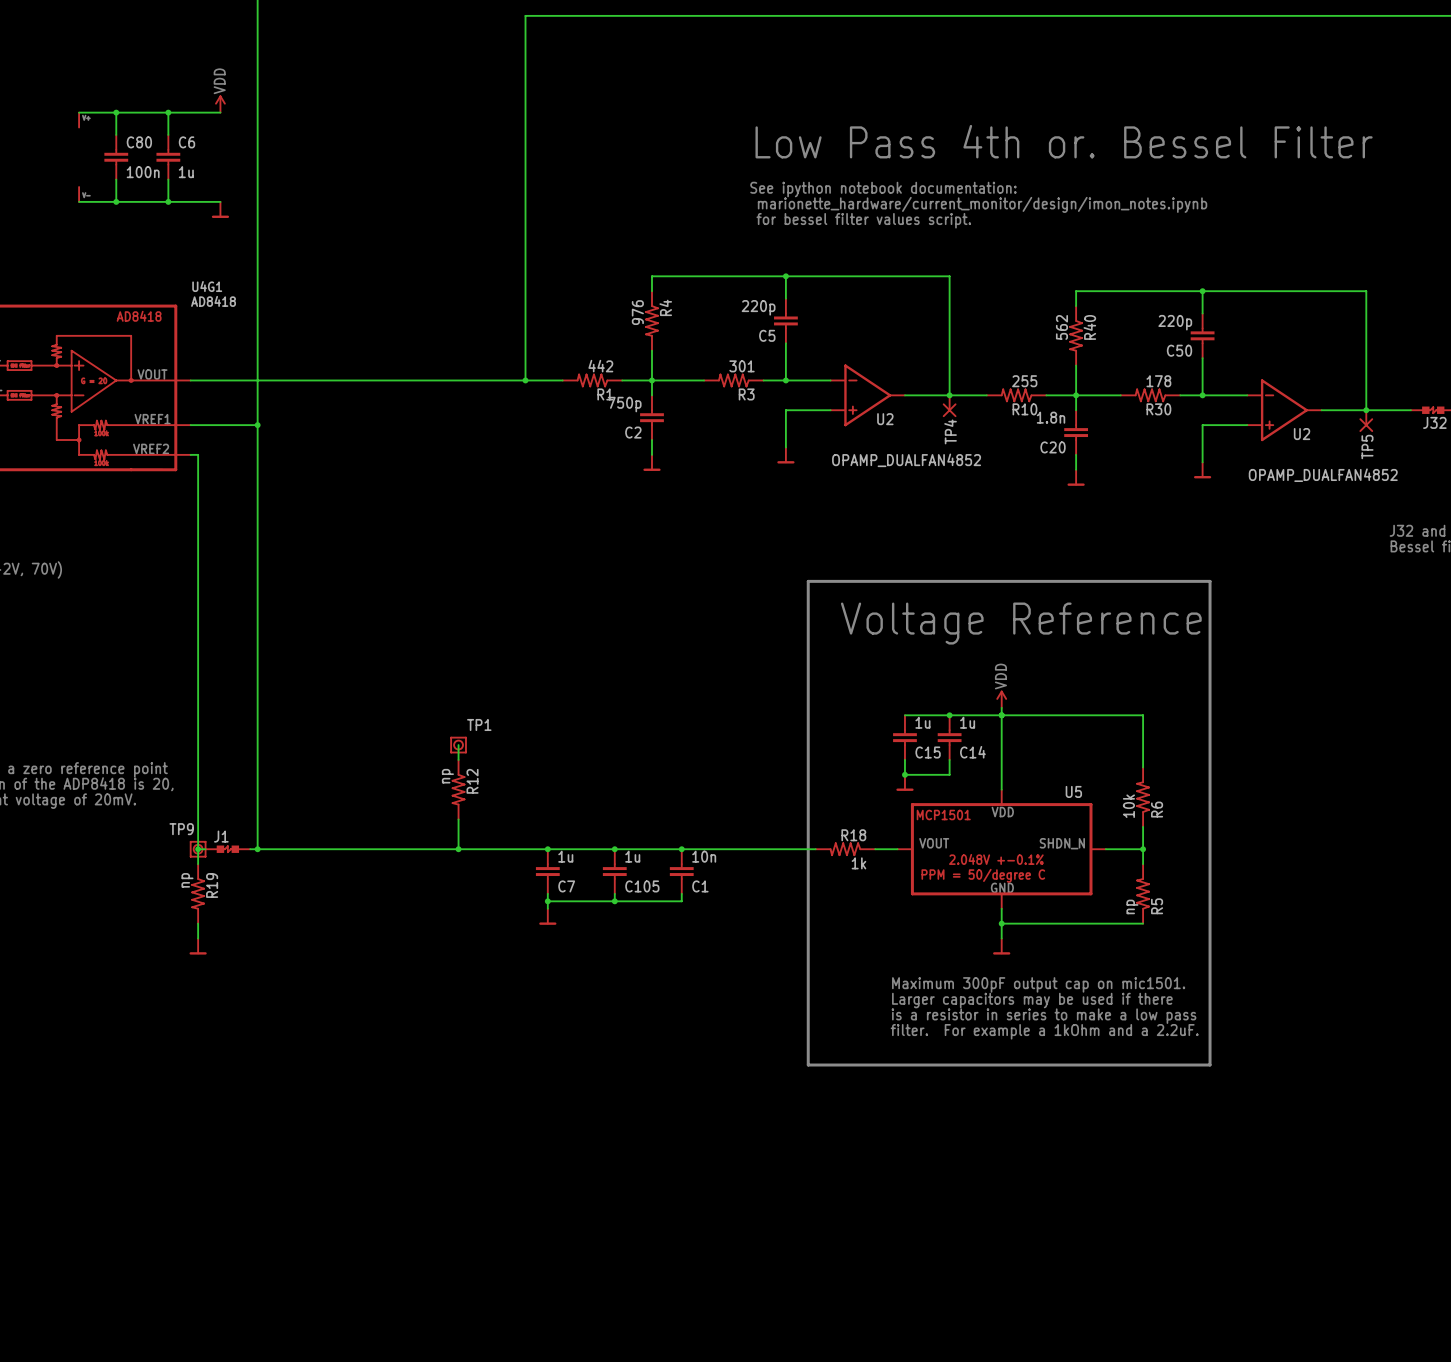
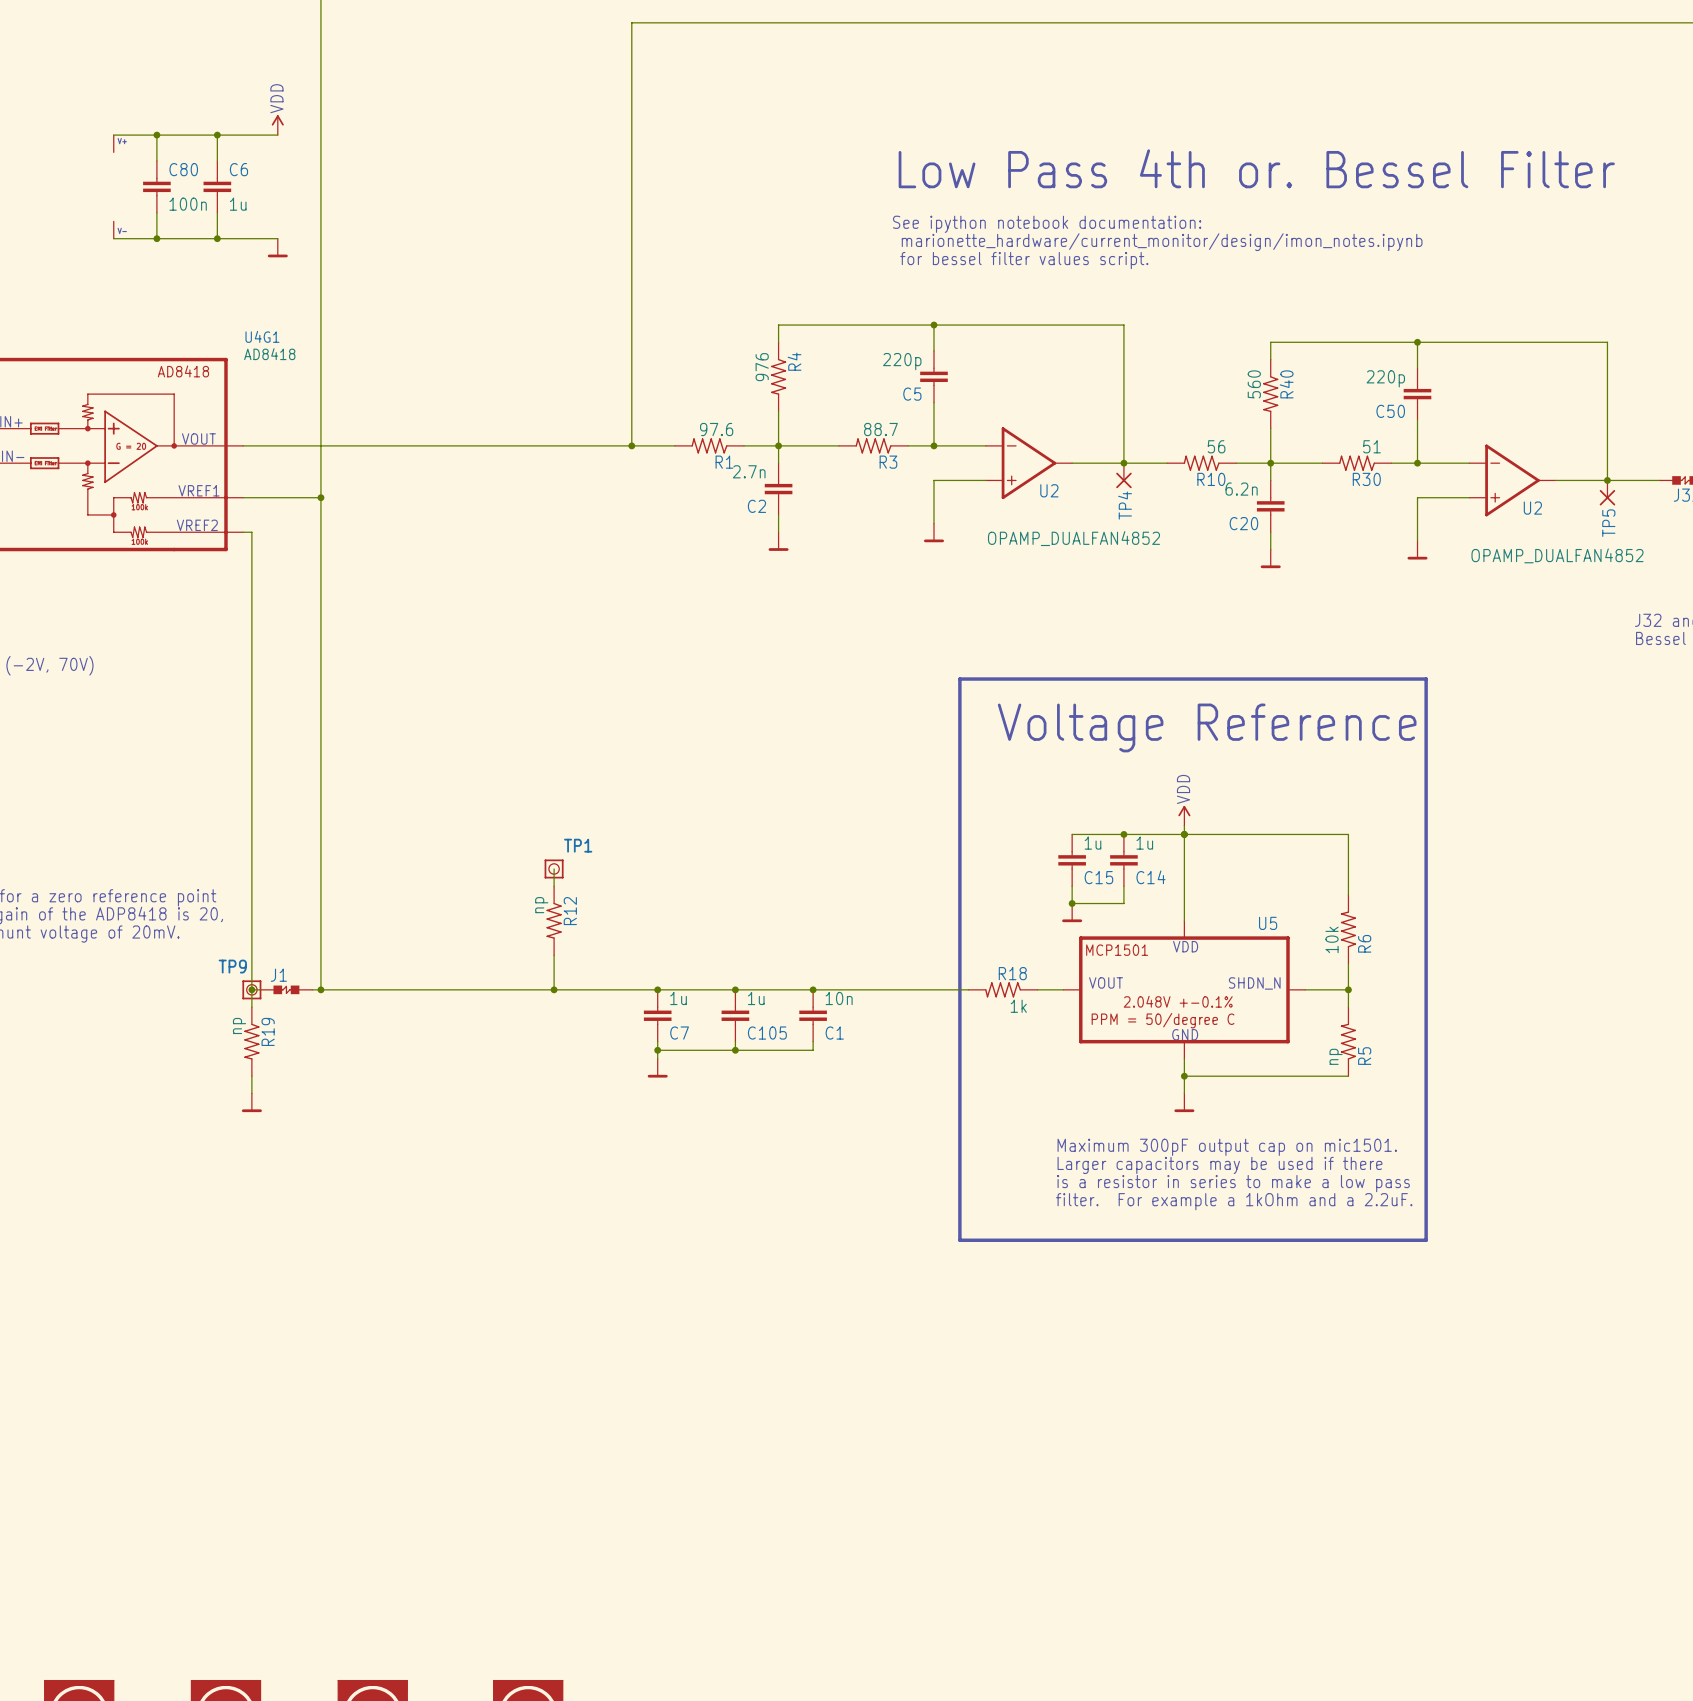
R40 value: 562 (1061, 327) -> 560 (1254, 384)
R1 value: 442 (600, 366) -> 97.6 (716, 429)
R3 value: 301 (742, 366) -> 88.7 (880, 429)
R10 value: 255 (1024, 381) -> 56 (1216, 446)
R30 value: 178 (1158, 381) -> 51 (1371, 446)
C2 value: 750p (624, 404) -> 2.7n (749, 471)
C20 value: 1.8n (1051, 417) -> 6.2n (1241, 489)

